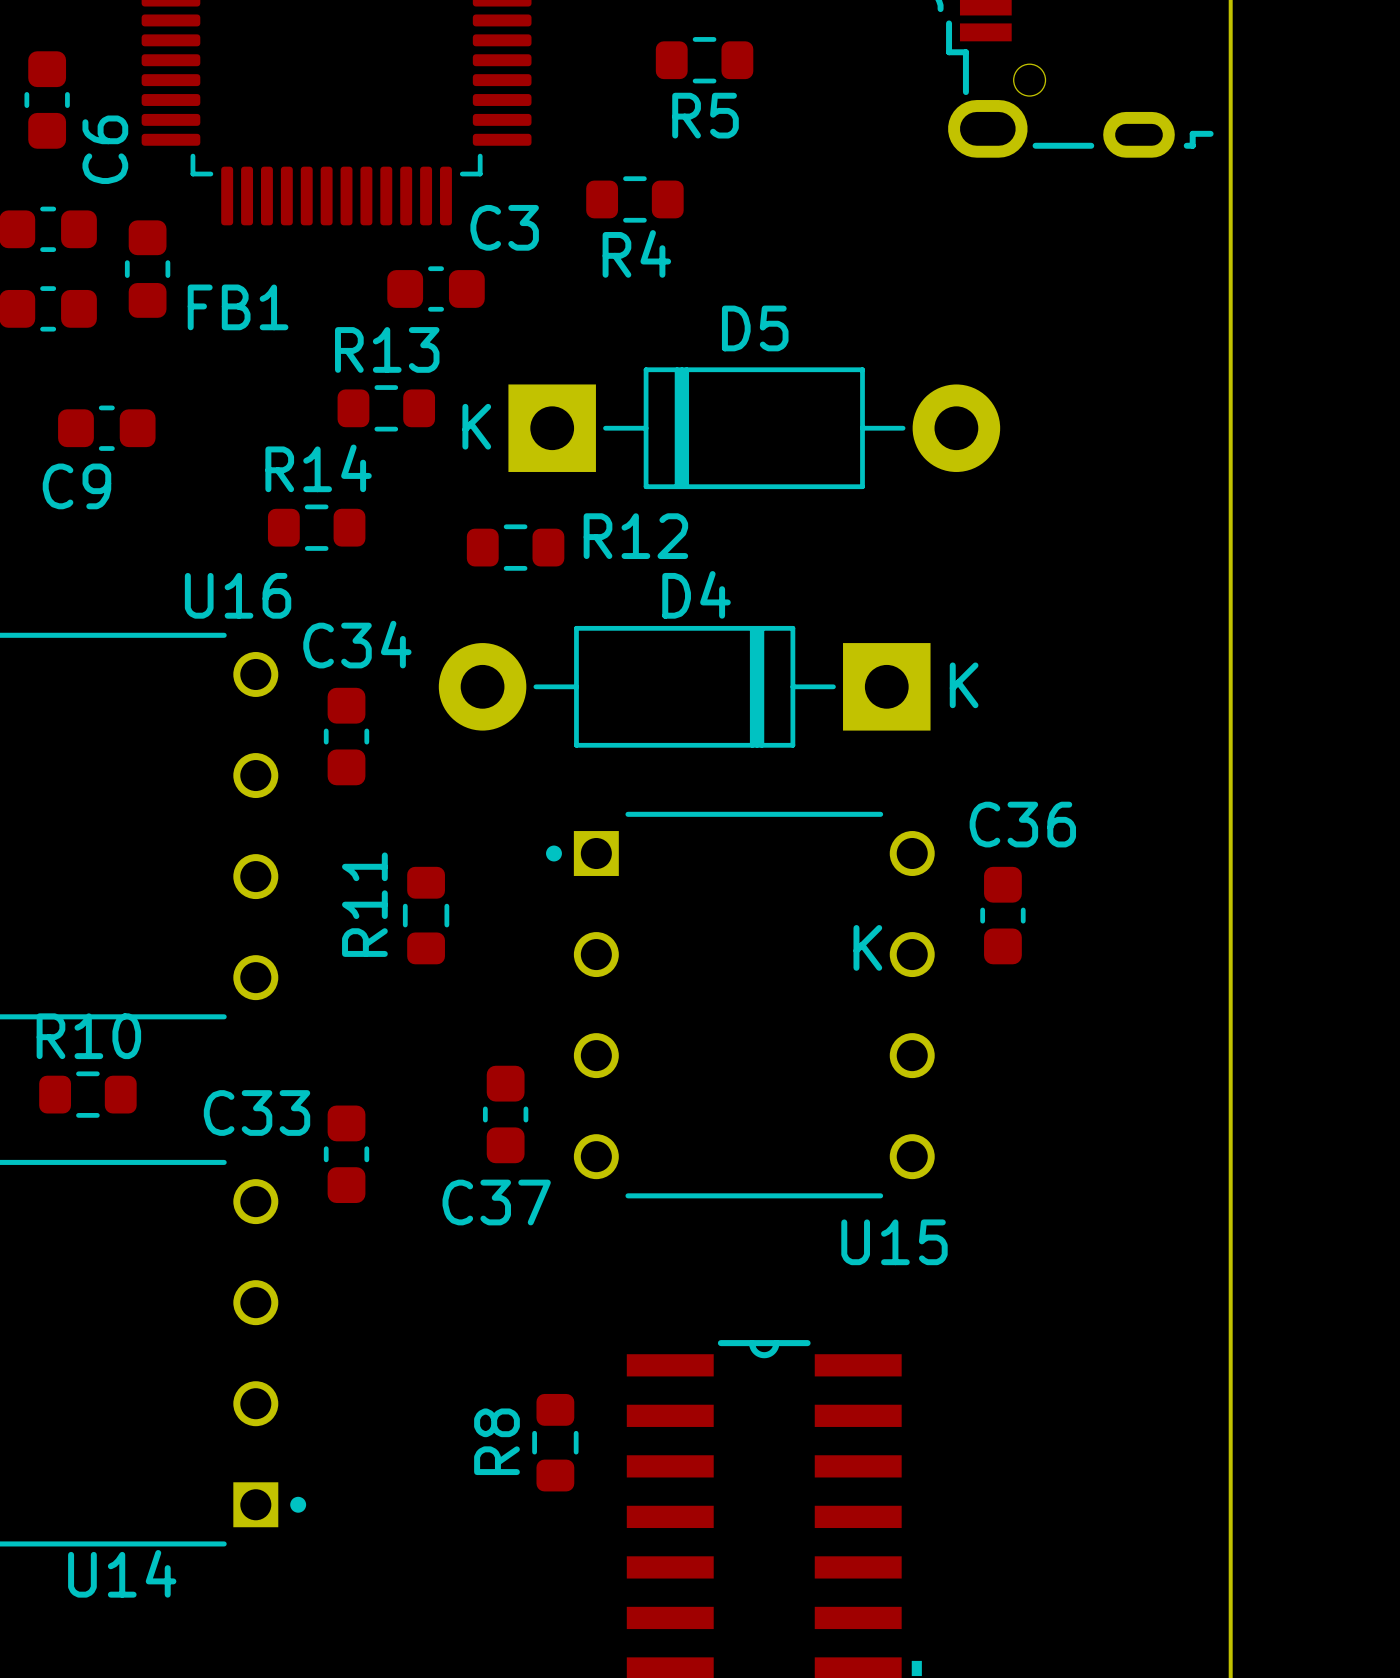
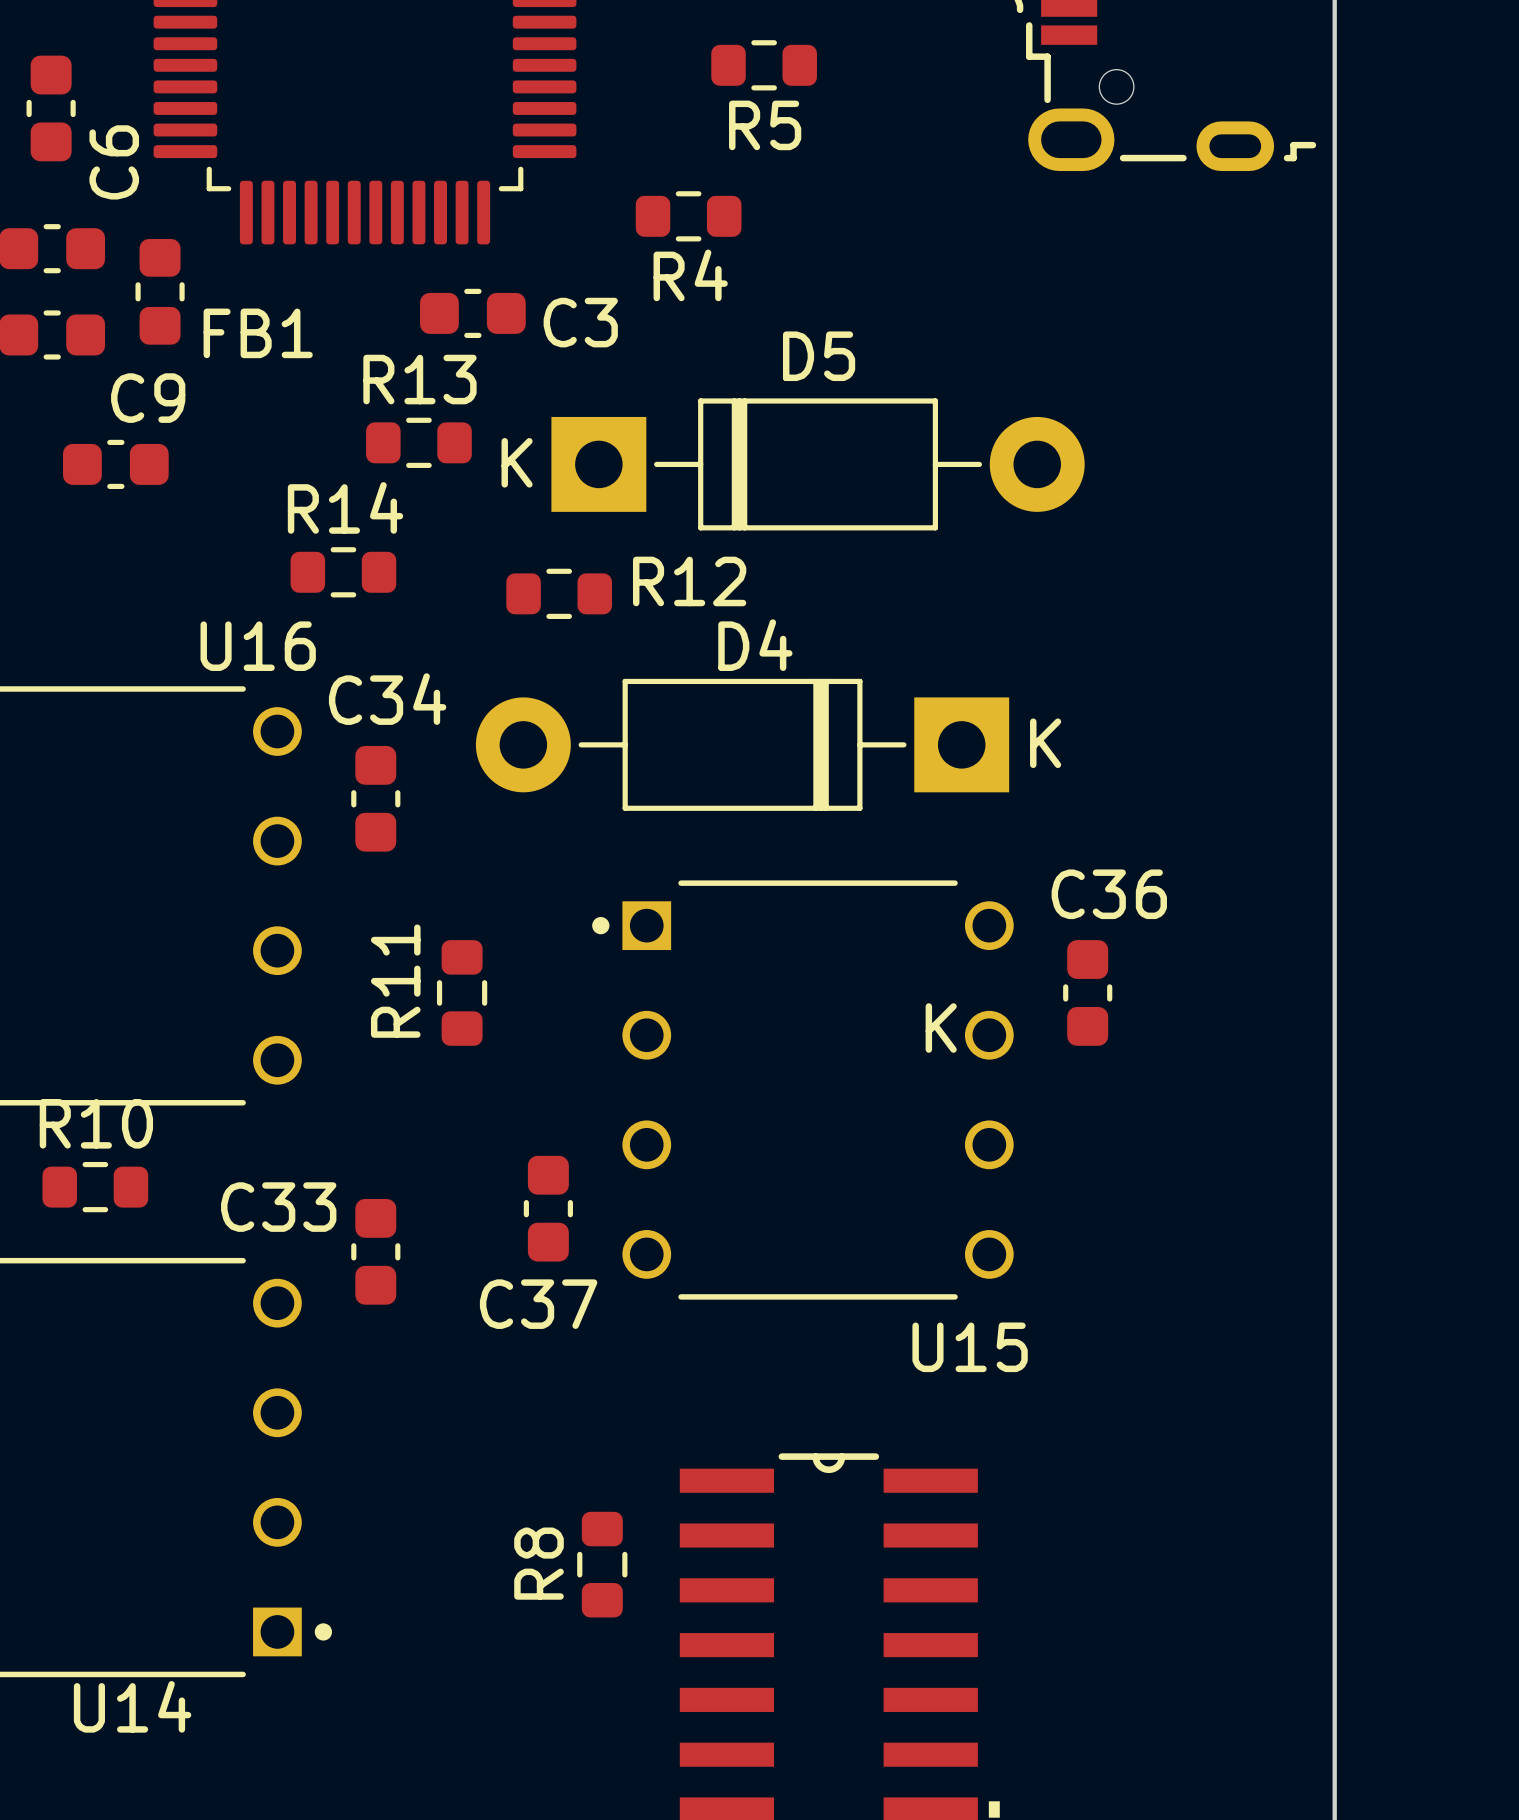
C3 name position: C3 (504, 227) -> C3 (580, 322)
C9 name position: C9 (76, 486) -> C9 (148, 398)

